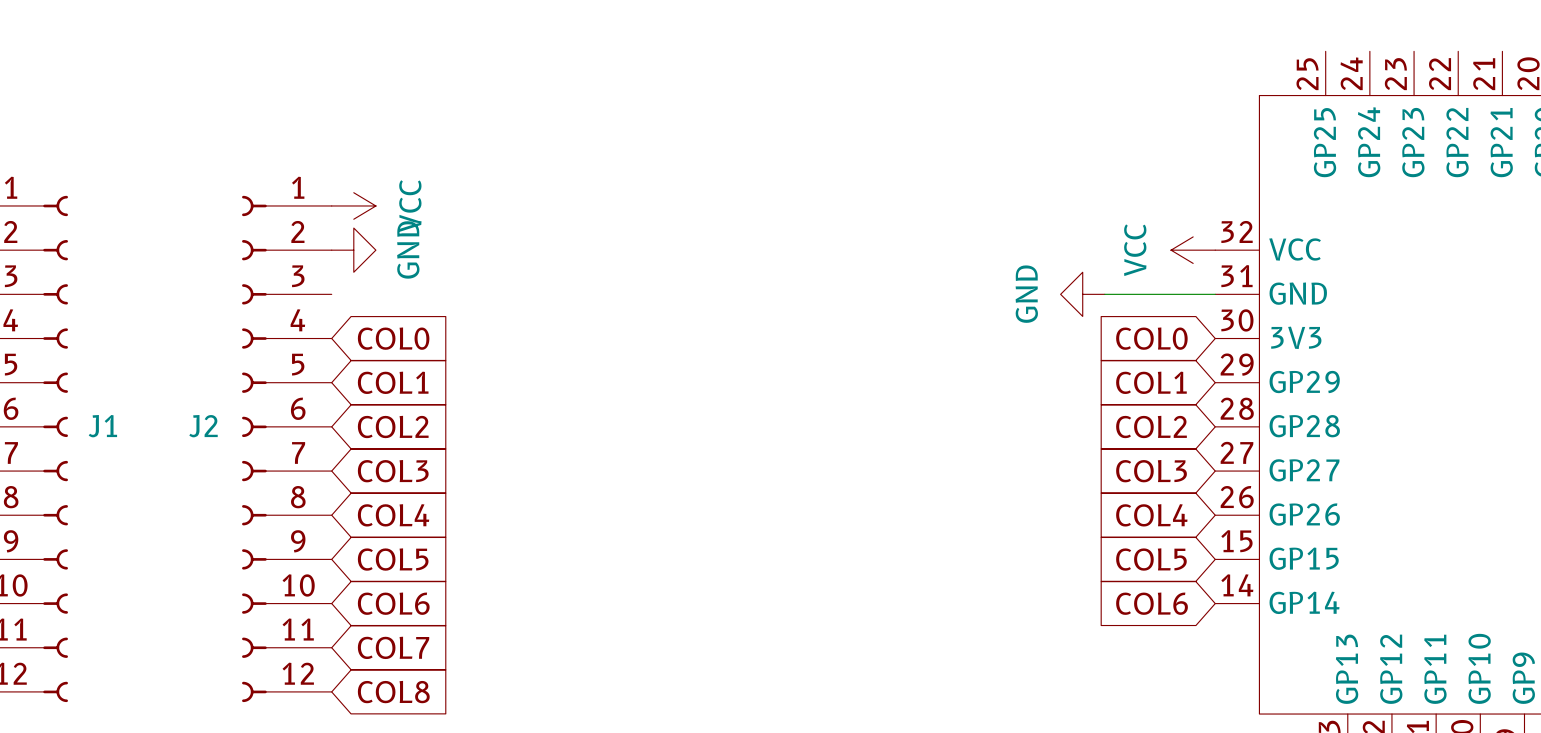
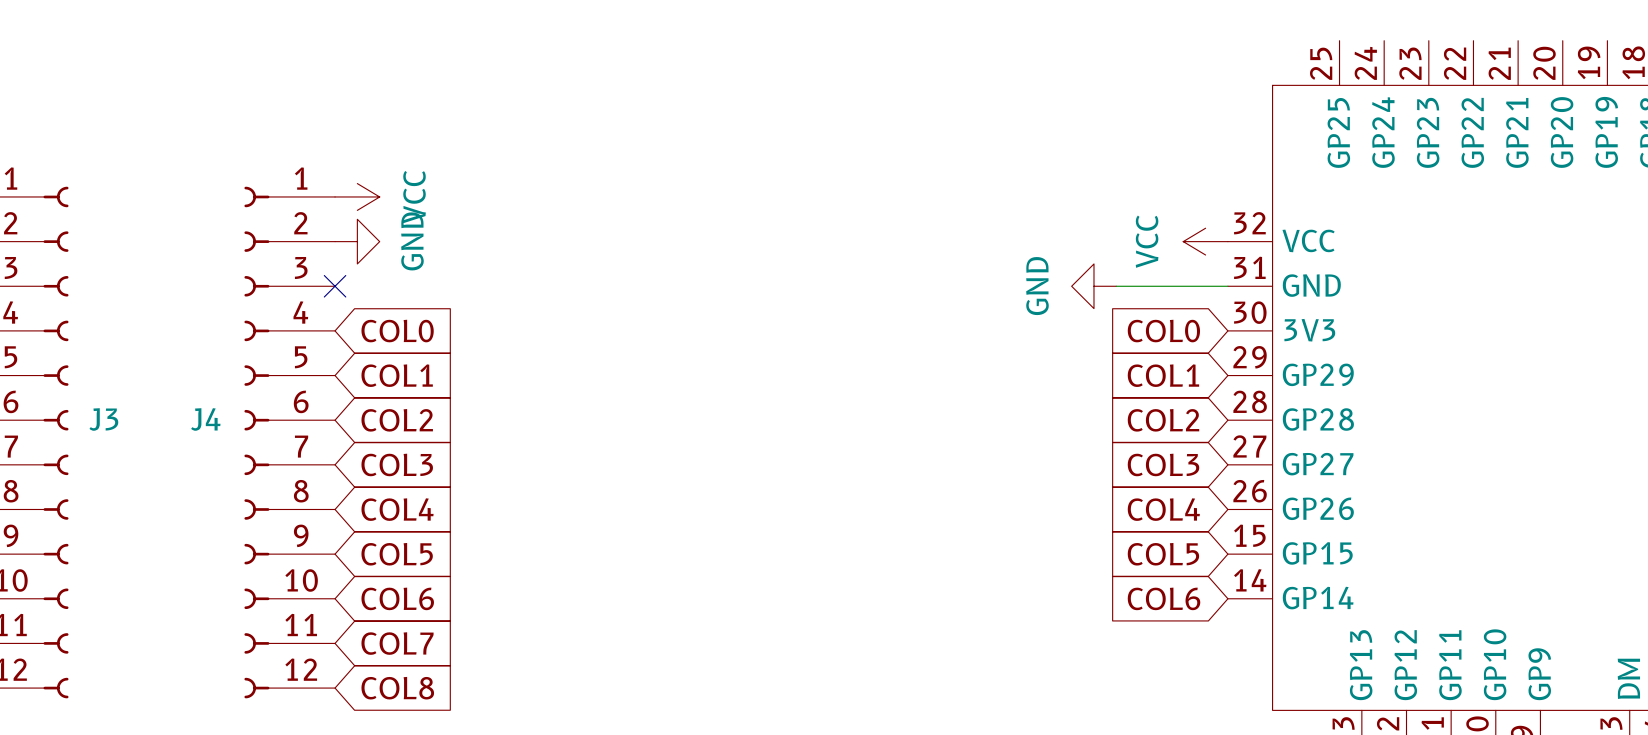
no-connect mark: none -> (335, 286)
J1 name: J1 (102, 426) -> J3 (103, 419)
J2 name: J2 (203, 426) -> J4 (205, 419)

